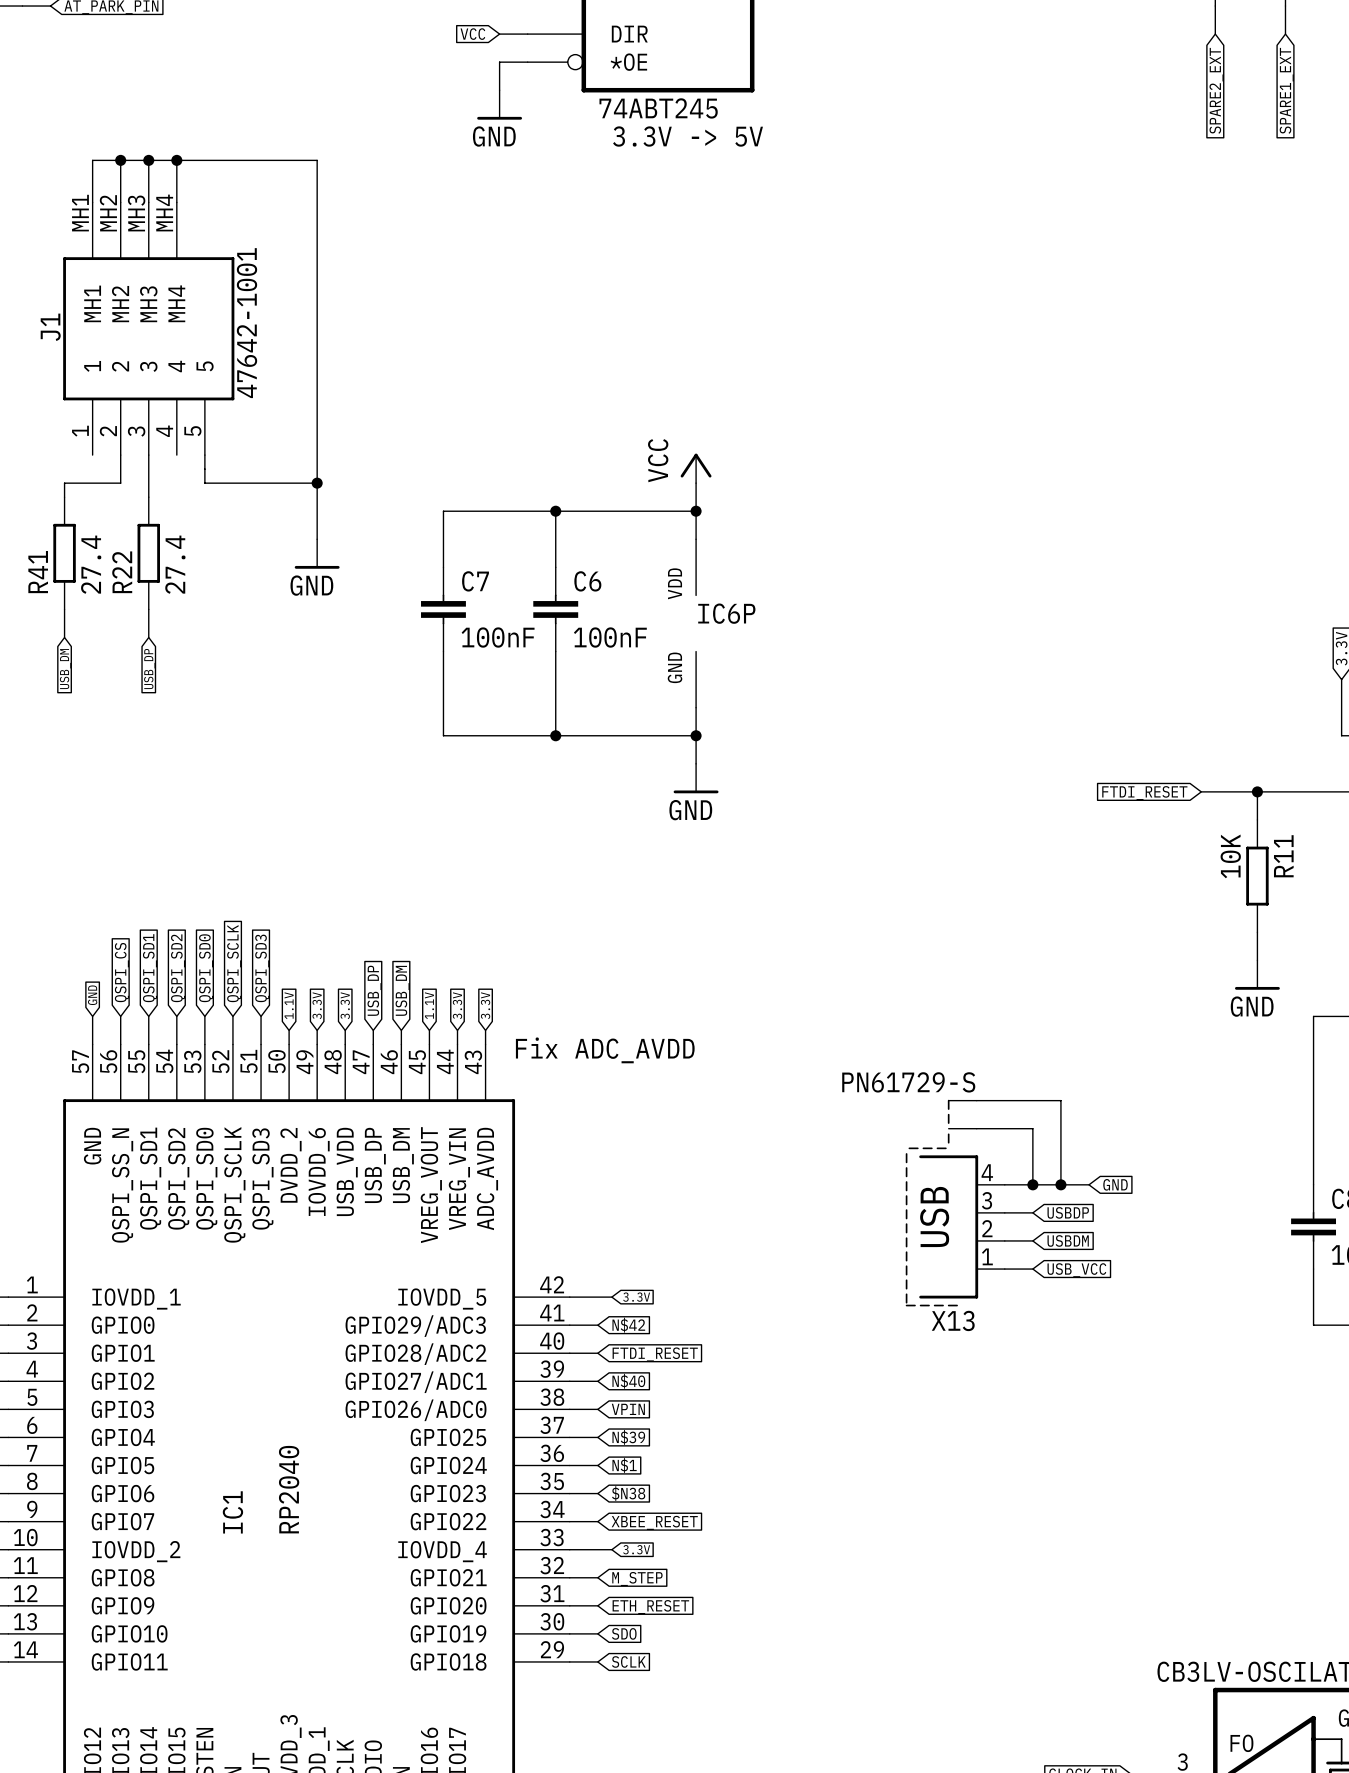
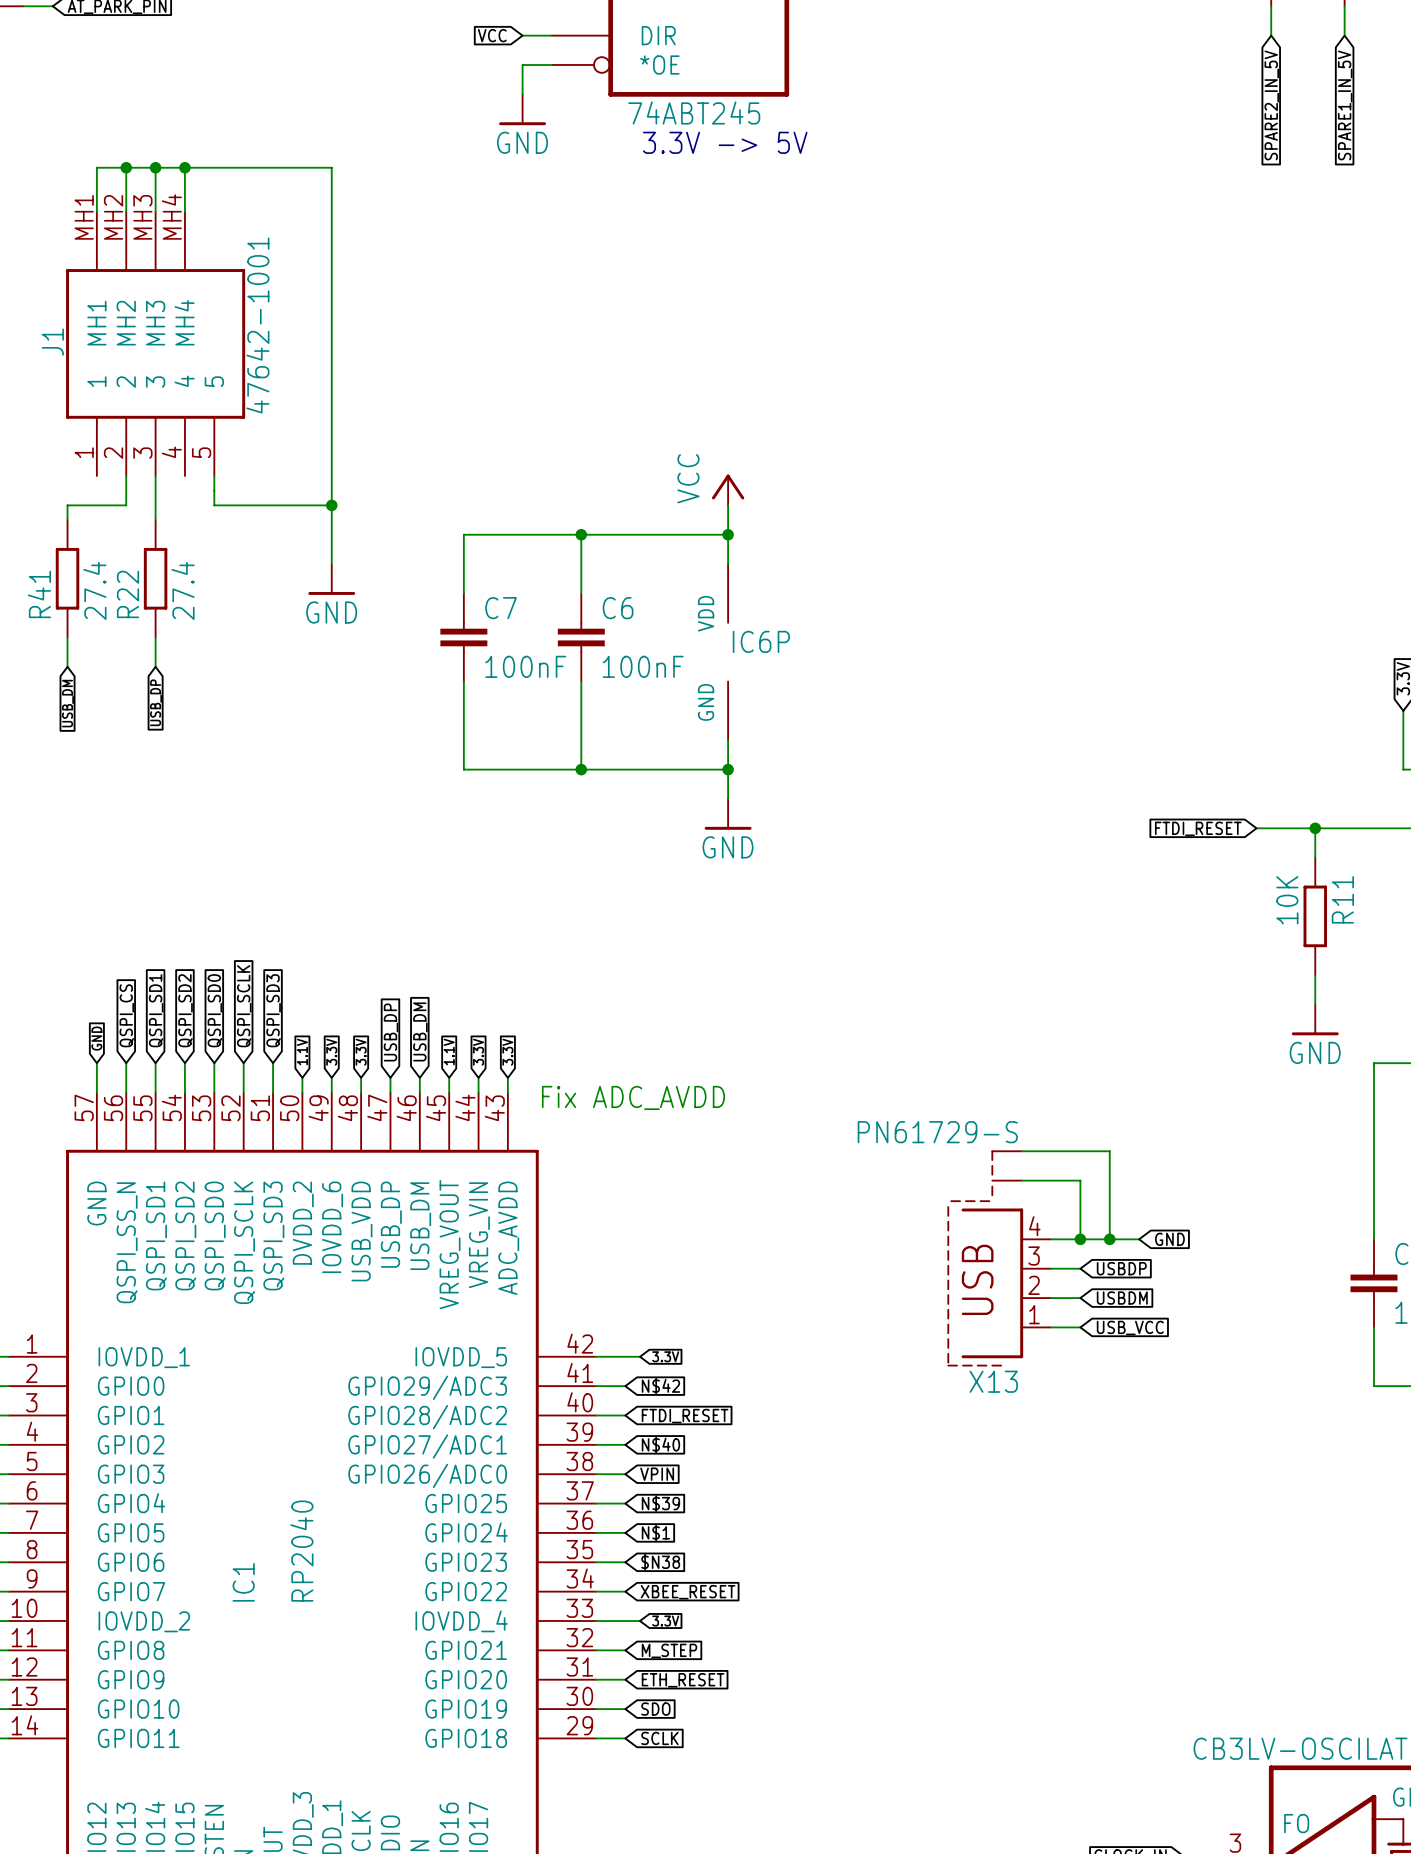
global label: SPARE2_EXT (1216, 90) -> SPARE2_IN_5V (1271, 105)
global label: SPARE1_EXT (1286, 90) -> SPARE1_IN_5V (1345, 105)

